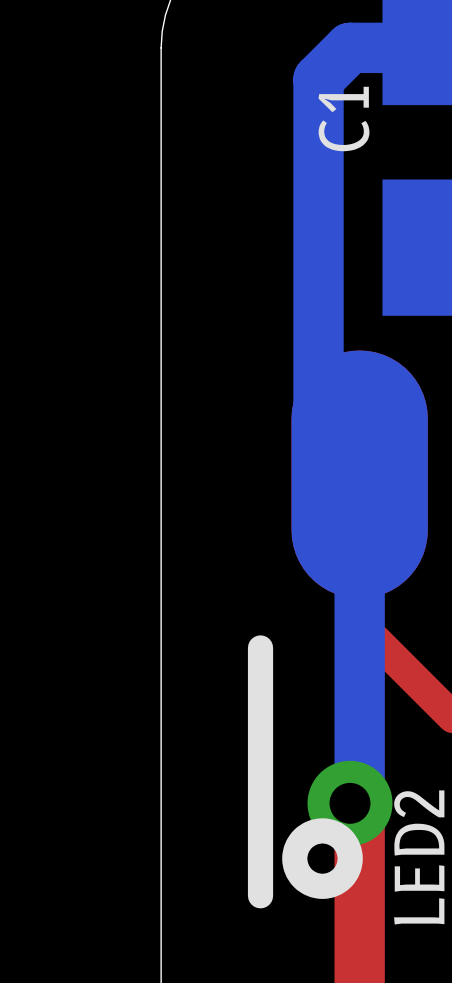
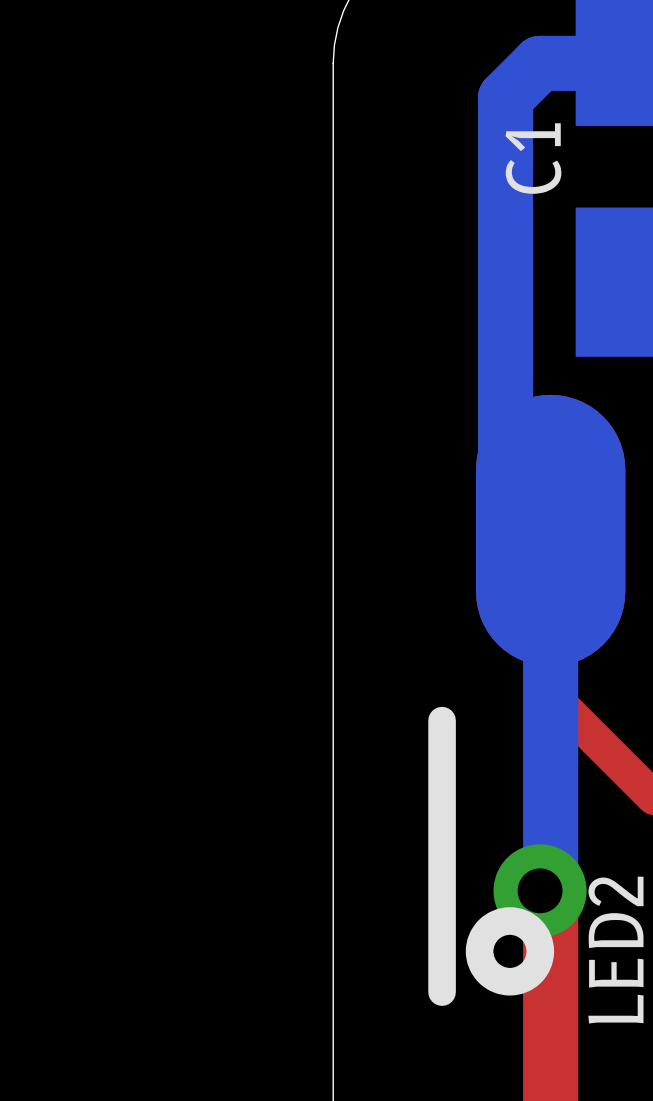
C1 name position: C1 (343, 119) -> C1 (533, 158)

